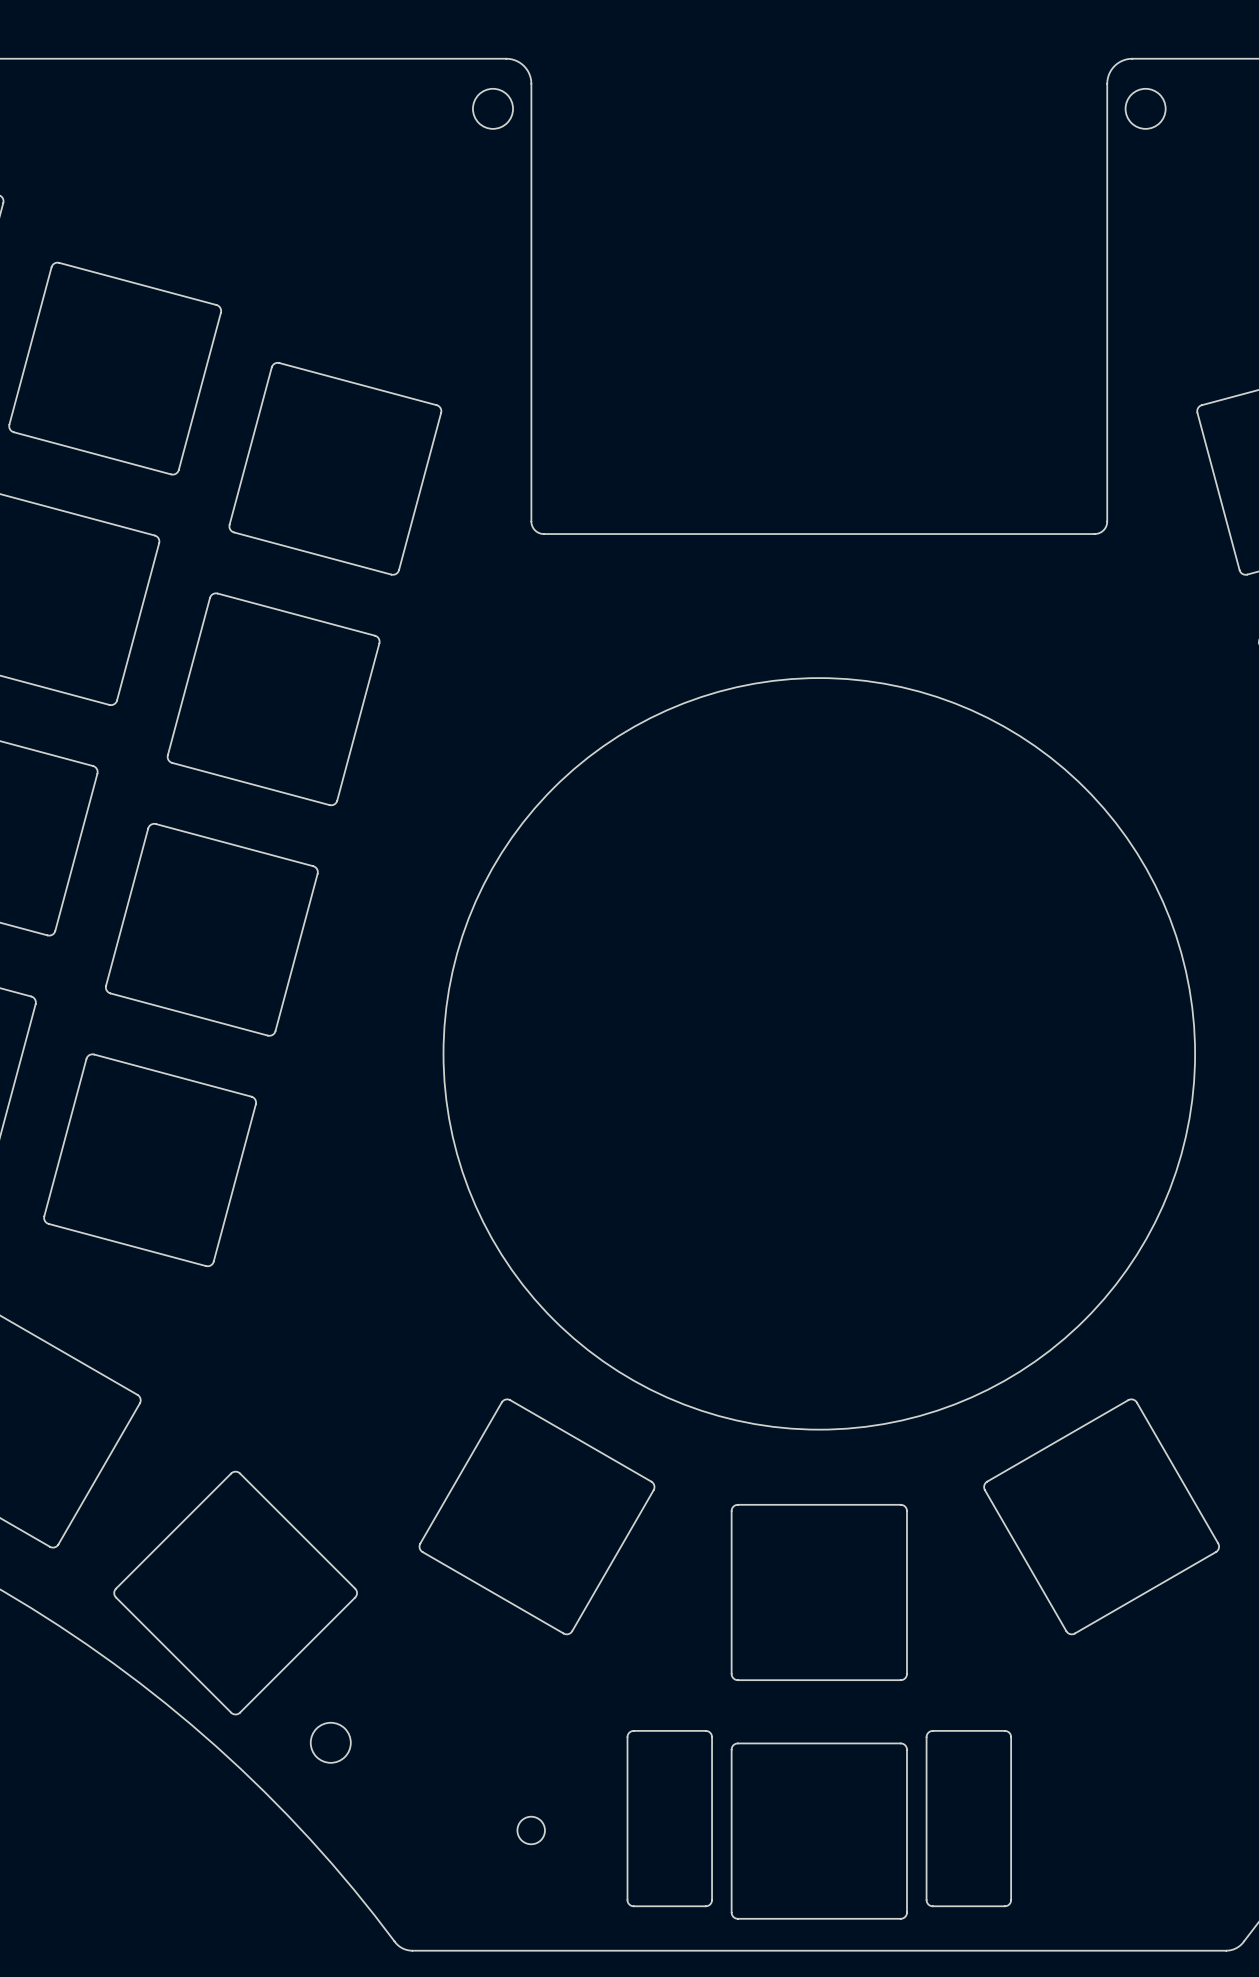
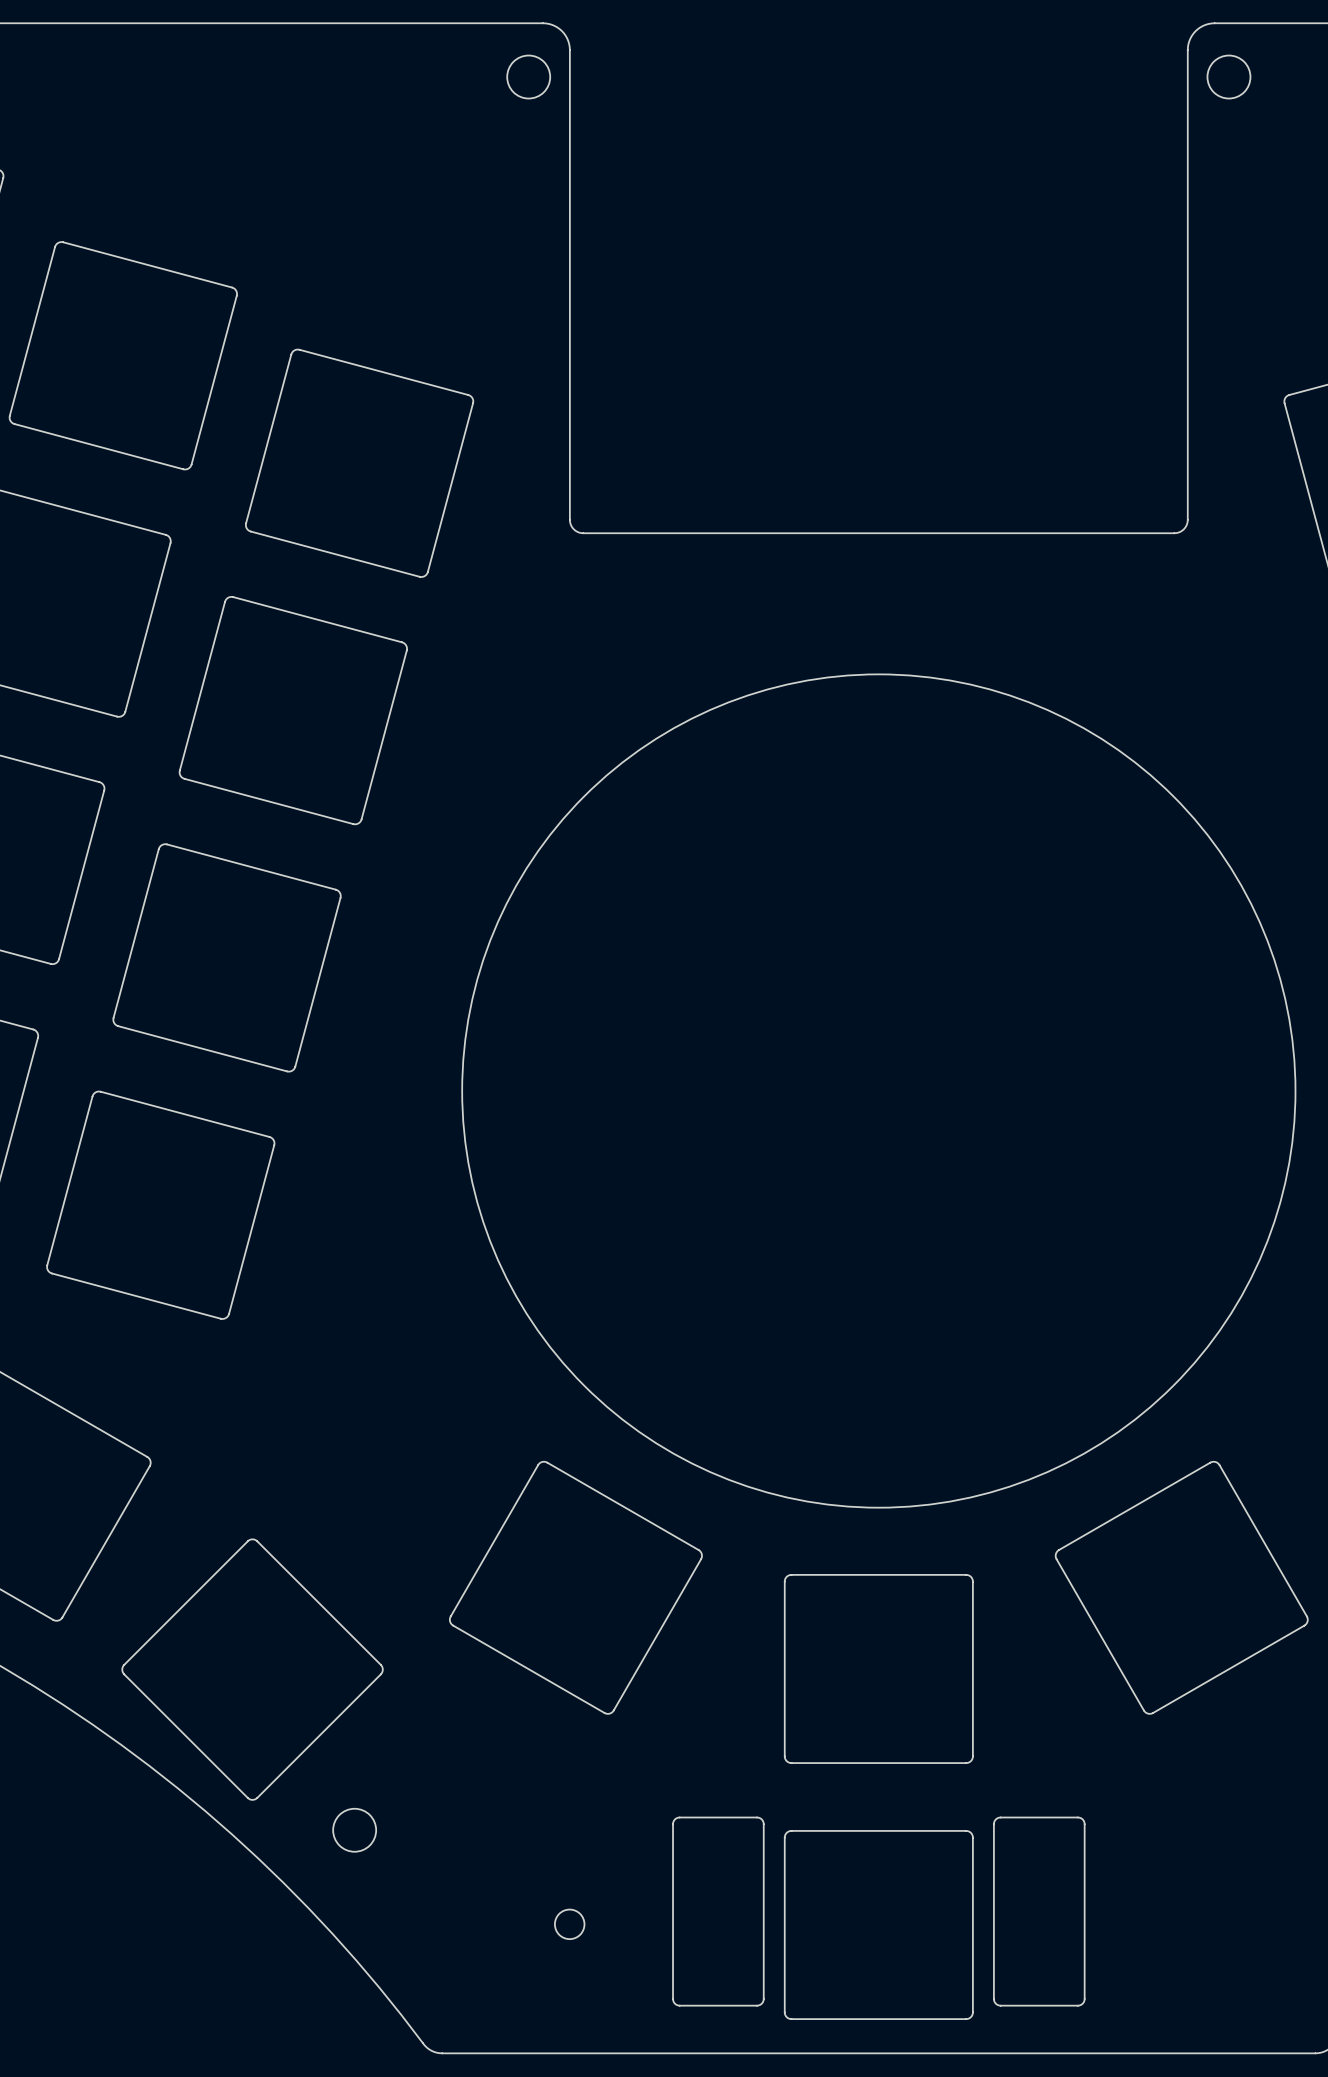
round board edge size: [442, 677, 1196, 1431] -> [461, 673, 1297, 1509]

